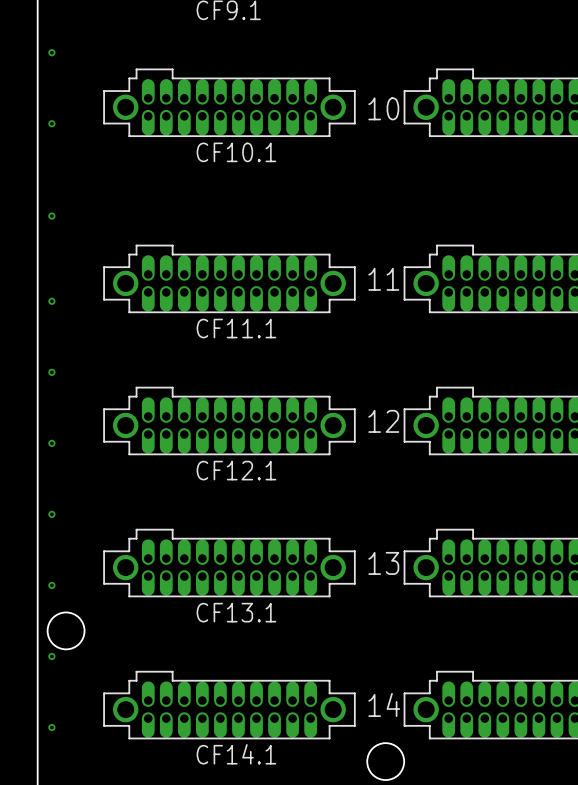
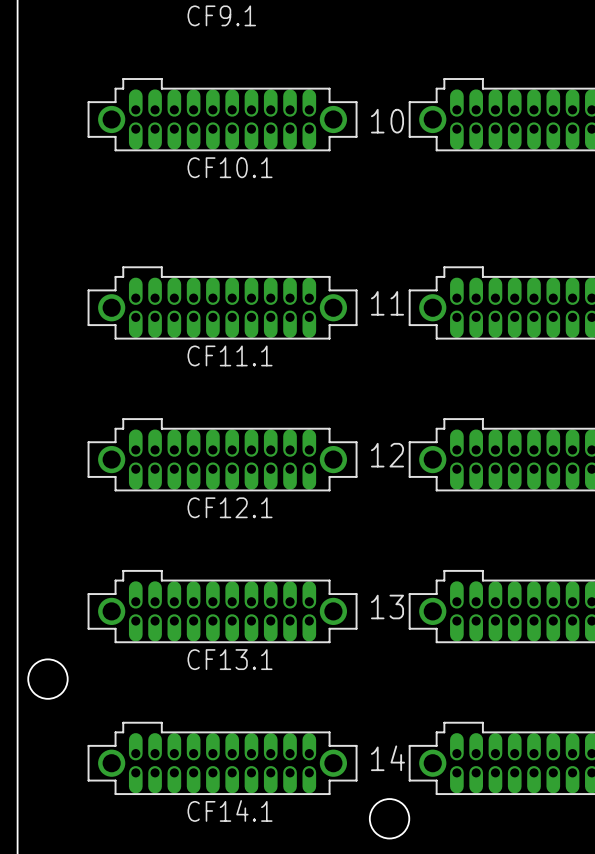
via: (51, 52) -> none
via: (51, 123) -> none
via: (51, 216) -> none
via: (51, 301) -> none
via: (51, 372) -> none
via: (51, 443) -> none
via: (51, 514) -> none
via: (51, 585) -> none
via: (51, 656) -> none
via: (51, 727) -> none

